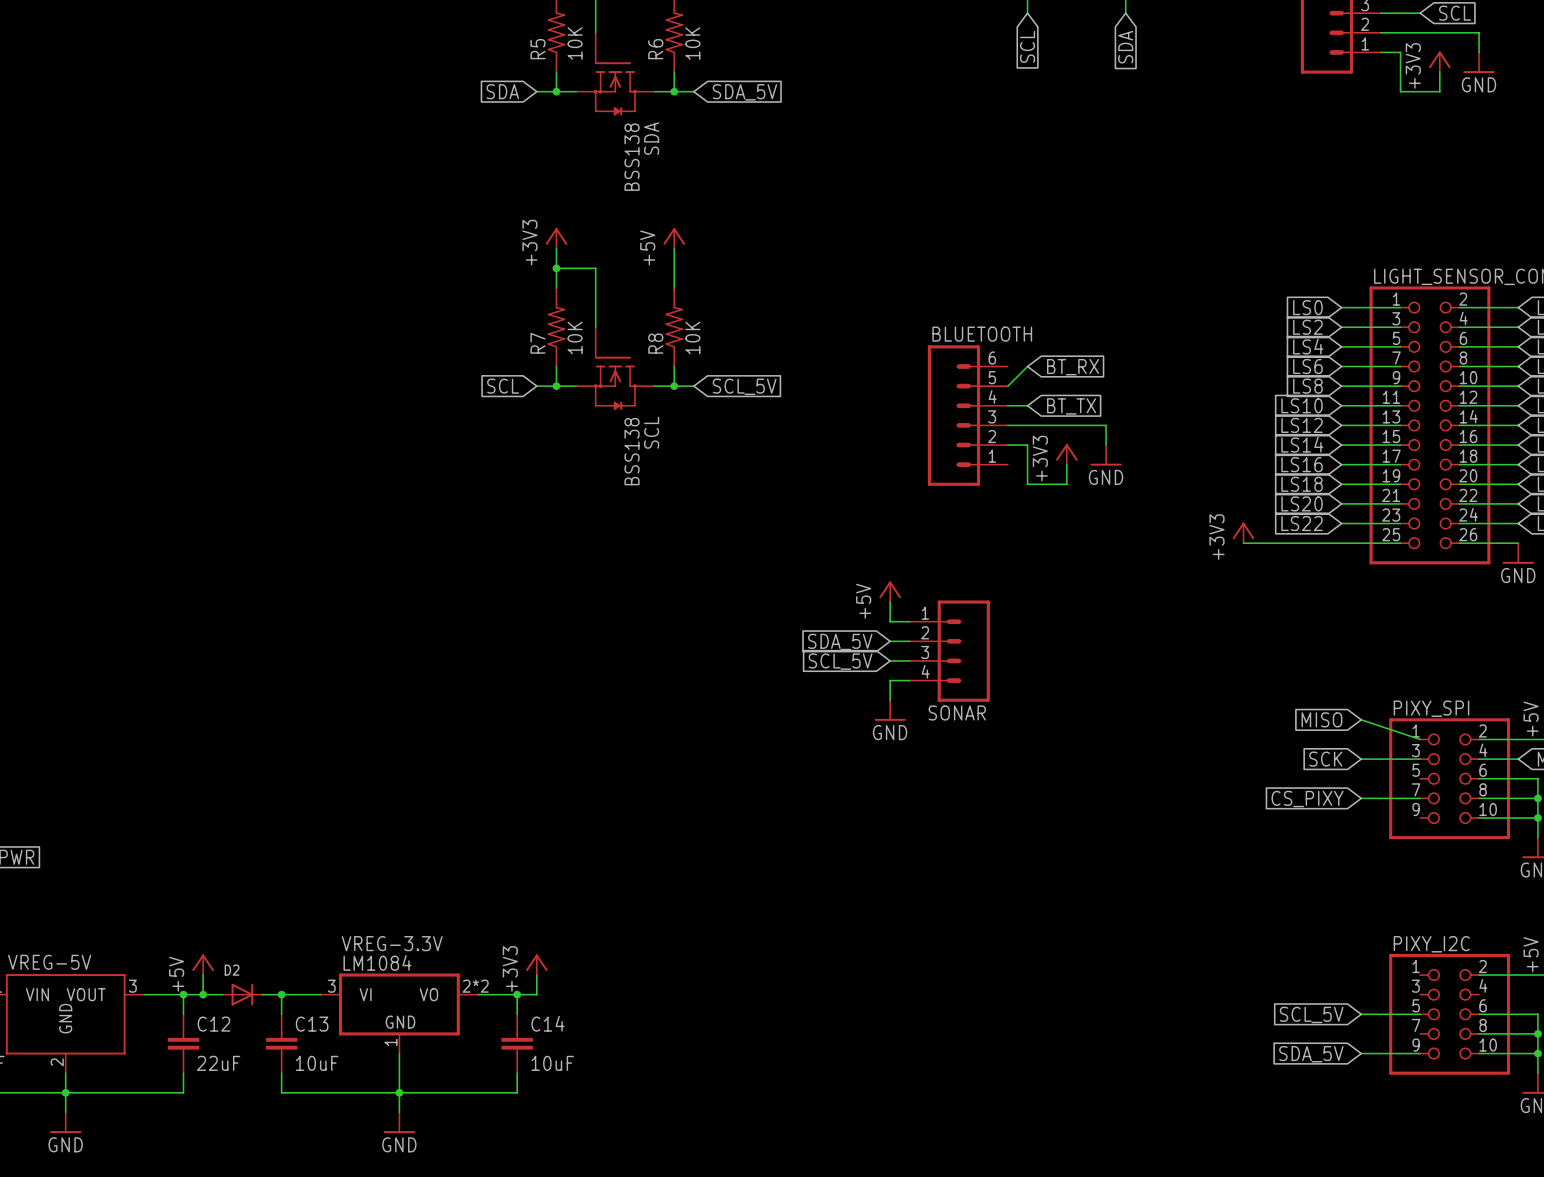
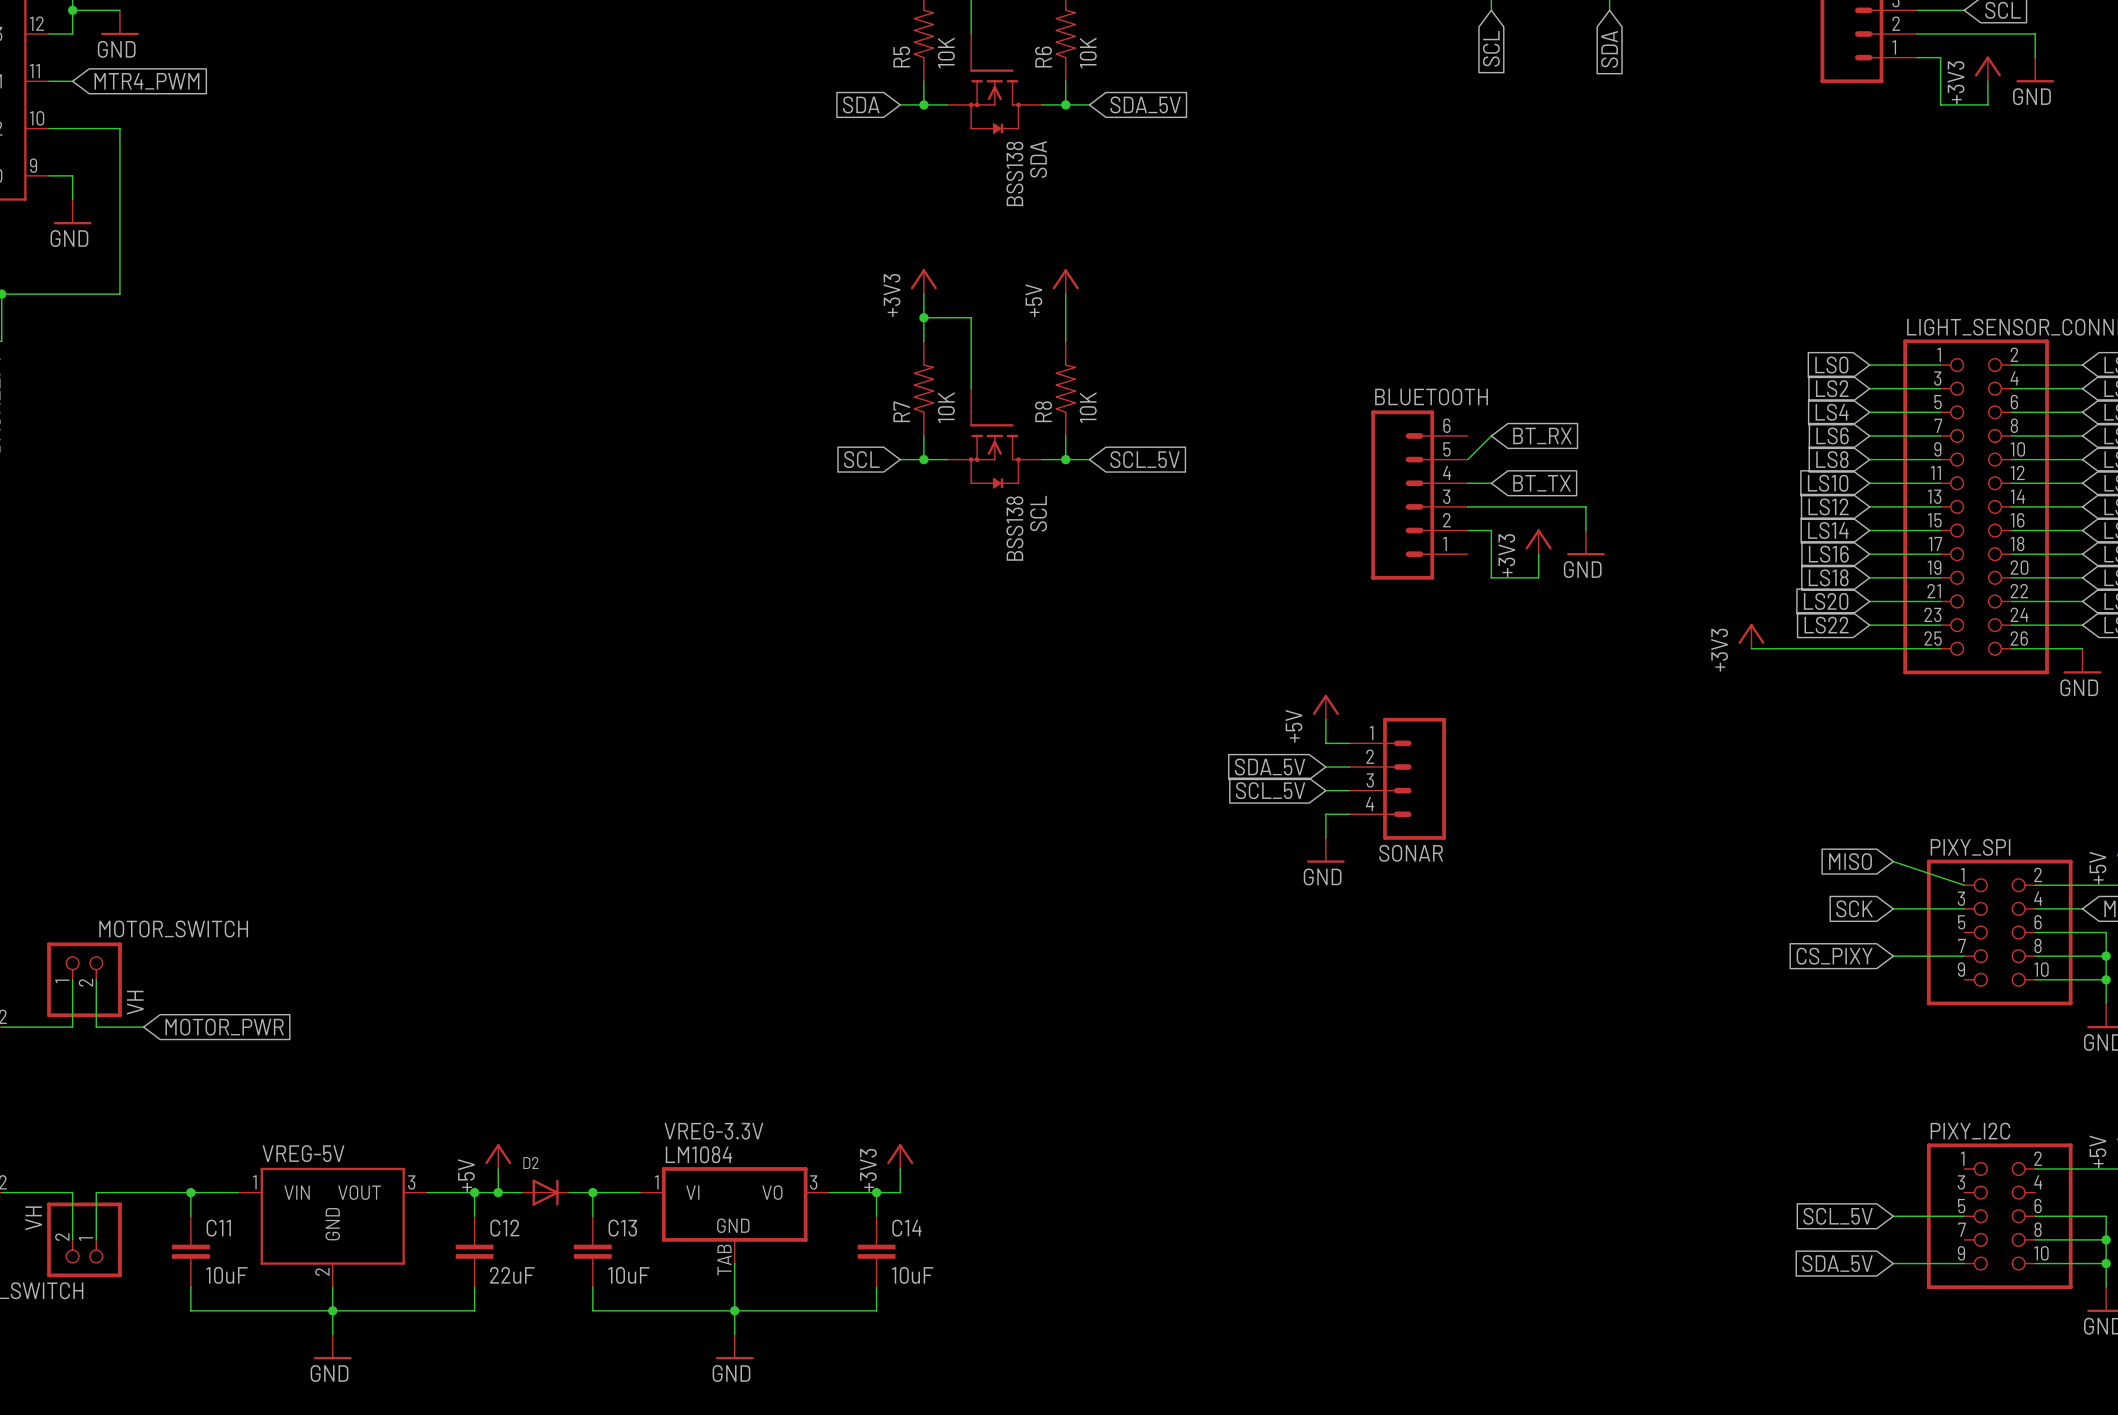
VREG-3.3V pin number: 3 (331, 986) -> 1 (656, 1182)
VREG-3.3V pin number: 2*2 (475, 986) -> 3 (813, 1182)
VREG-3.3V pin number: 1 (390, 1042) -> TAB (724, 1260)

